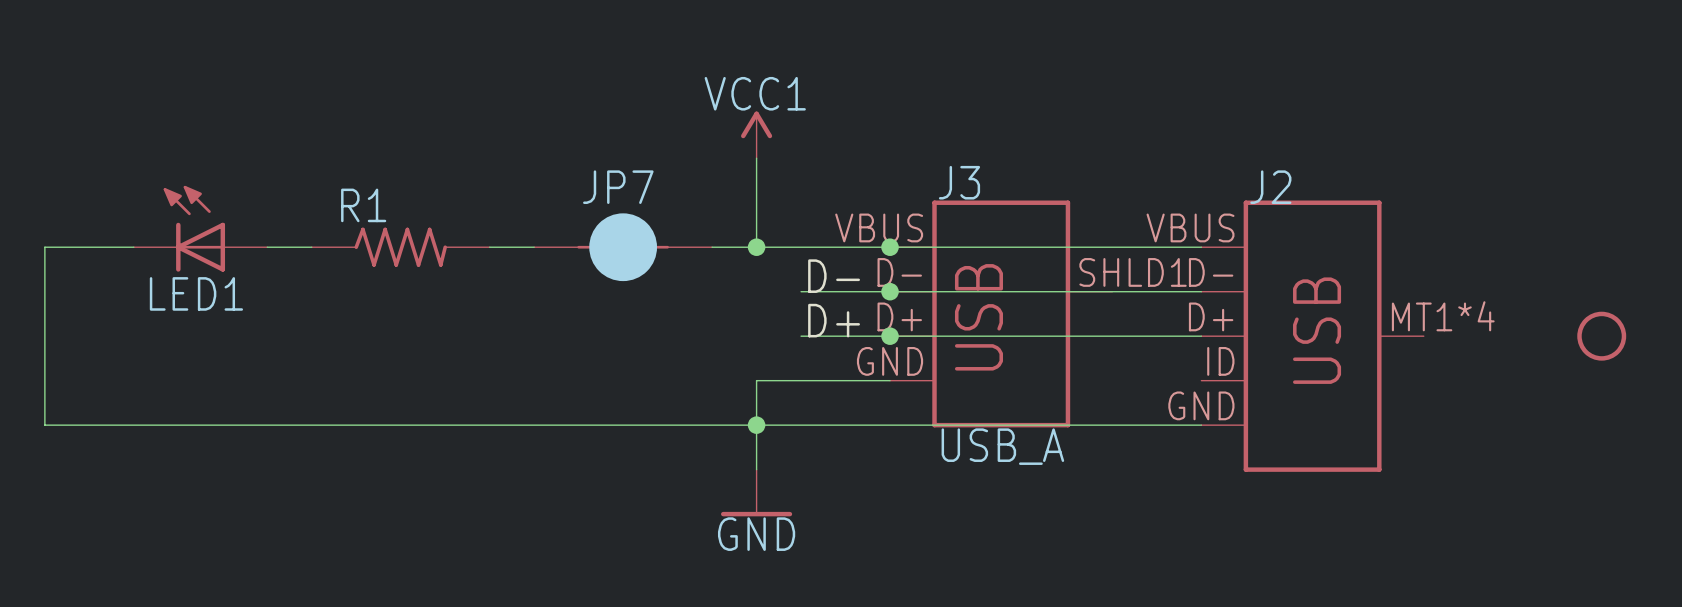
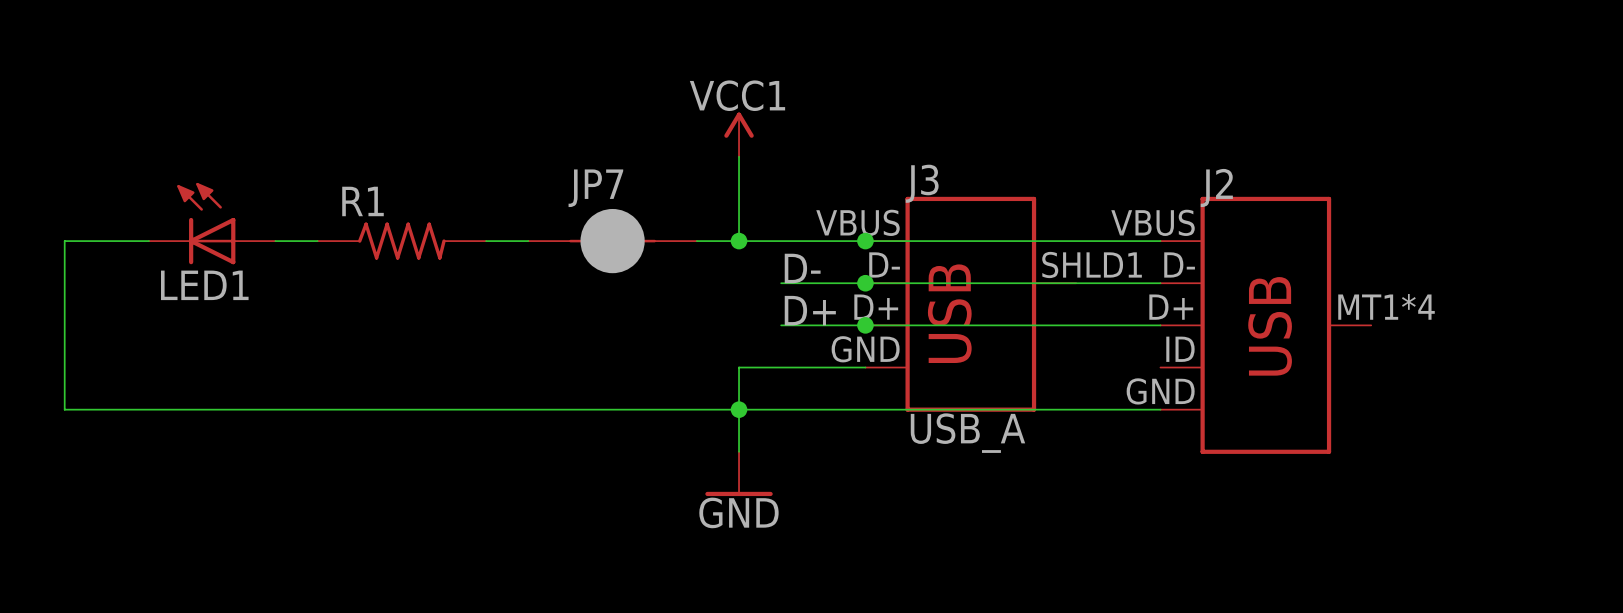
part: (1601, 336) -> none

